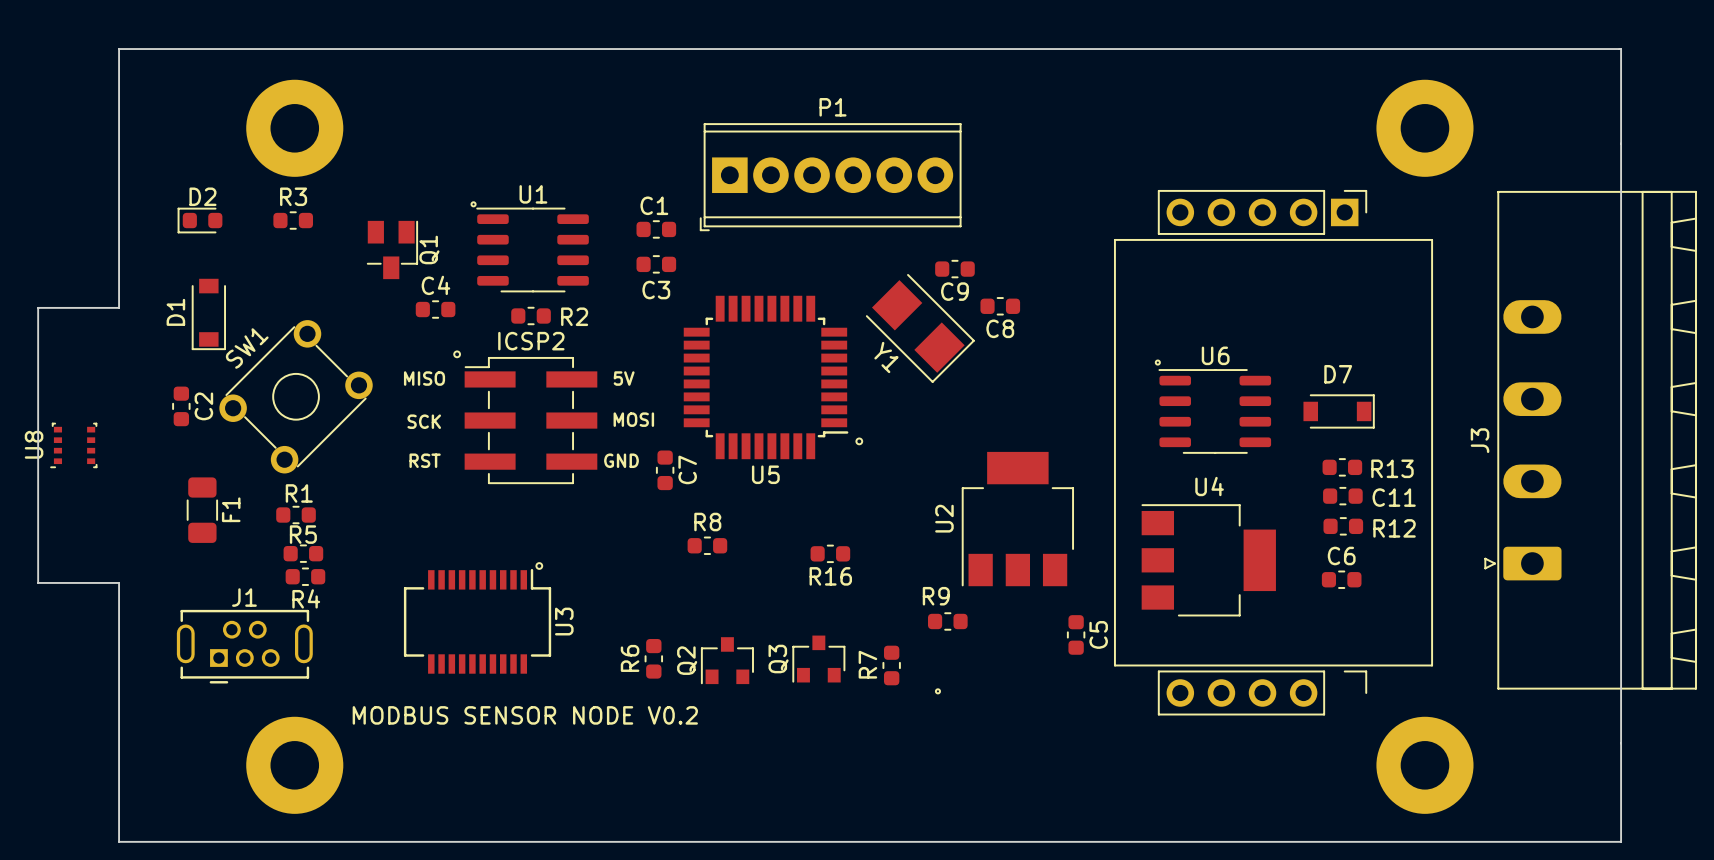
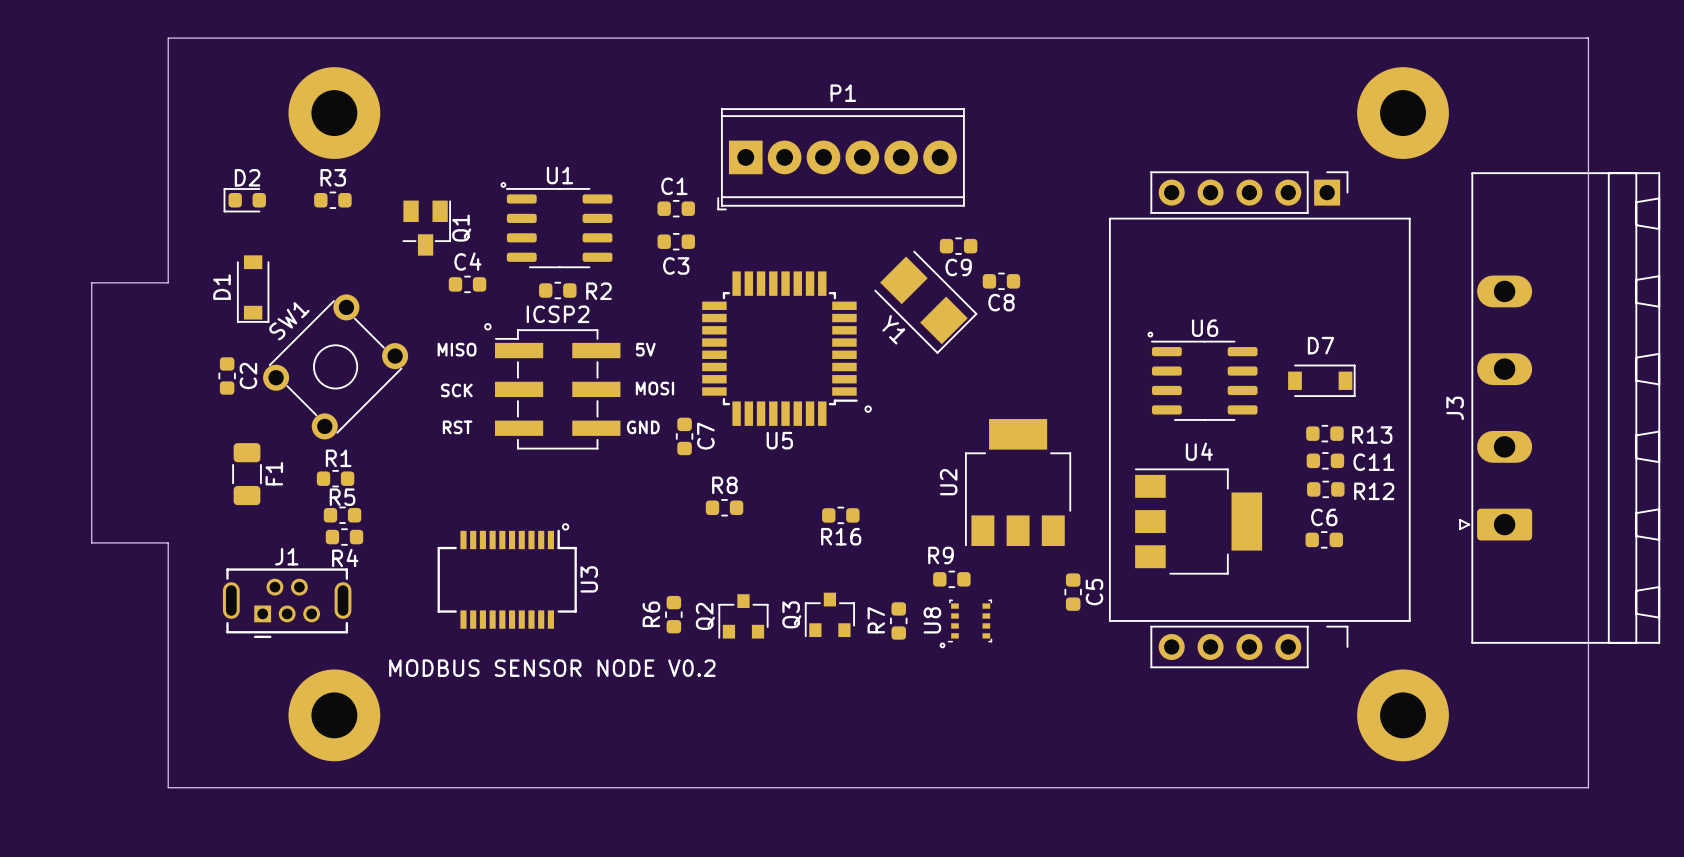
U8 position: (73, 445) -> (969, 620)

